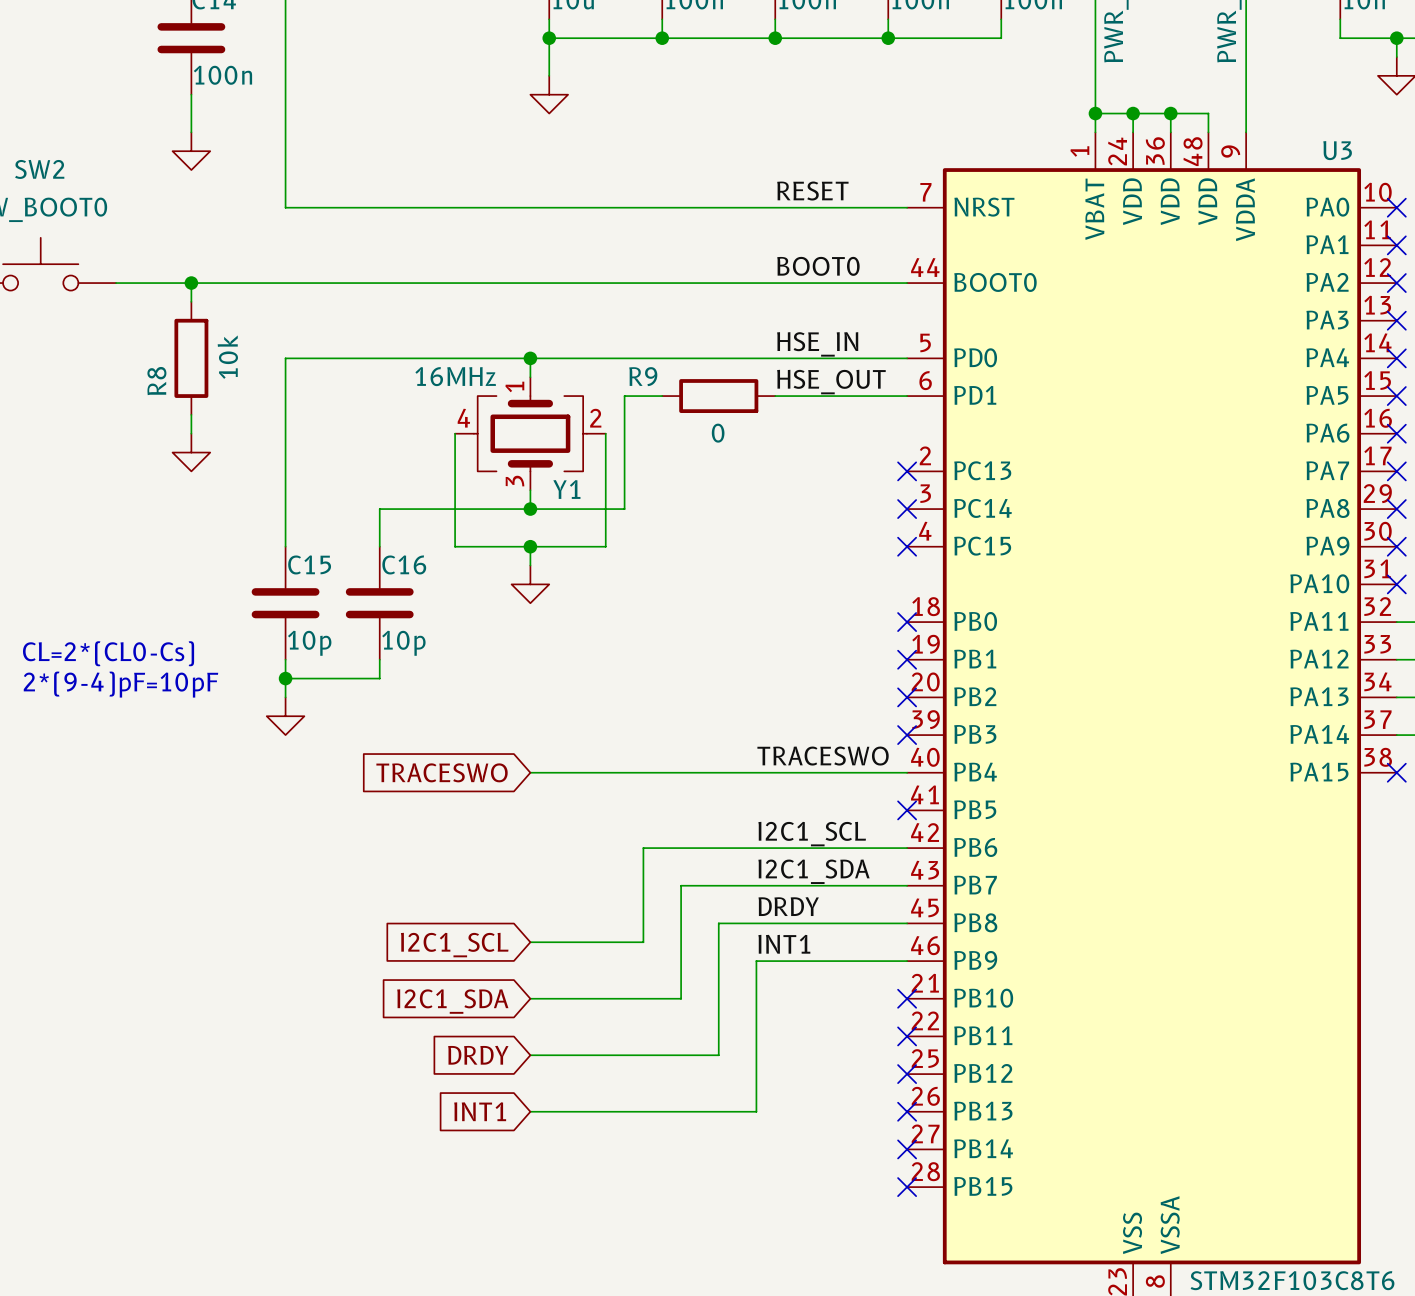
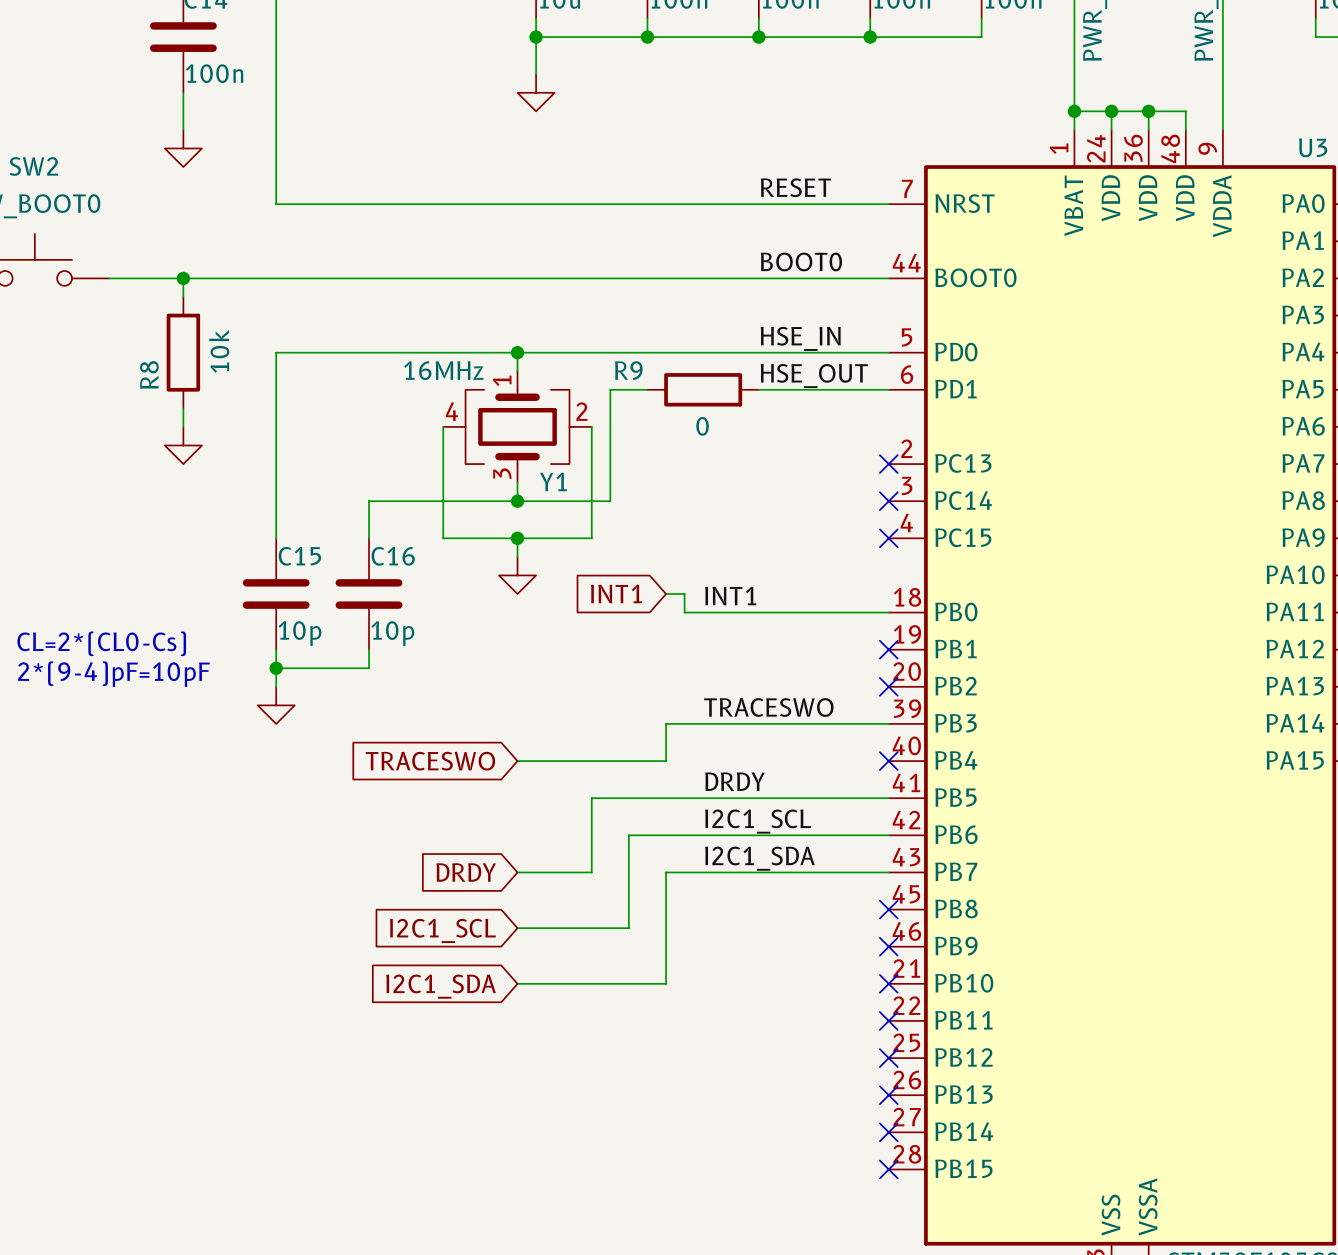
global label: none -> INT1 (616, 594)
wire: none -> (666, 594) (684, 594) (684, 612) (888, 612)
no-connect mark: (907, 622) -> none
no-connect mark: (907, 735) -> none
label position: TRACESWO (823, 756) -> TRACESWO (768, 707)
wire: (681, 772) (907, 772) -> (666, 761) (666, 723) (888, 723)
no-connect mark: none -> (888, 761)
wire: none -> (888, 798) (591, 798) (591, 872) (517, 872)
no-connect mark: (907, 810) -> none
label position: I2C1_SCL (812, 834) -> I2C1_SCL (758, 821)
label position: I2C1_SDA (814, 871) -> I2C1_SDA (759, 858)
label position: DRDY (788, 906) -> DRDY (734, 781)
wire: (907, 923) (718, 923) (718, 1055) (530, 1055) -> none
no-connect mark: none -> (888, 909)
label position: INT1 (784, 944) -> INT1 (730, 596)
wire: (907, 961) (756, 961) (756, 1111) (530, 1111) -> none
no-connect mark: none -> (888, 946)
global label position: DRDY (478, 1055) -> DRDY (466, 872)
global label: INT1 (480, 1111) -> none

